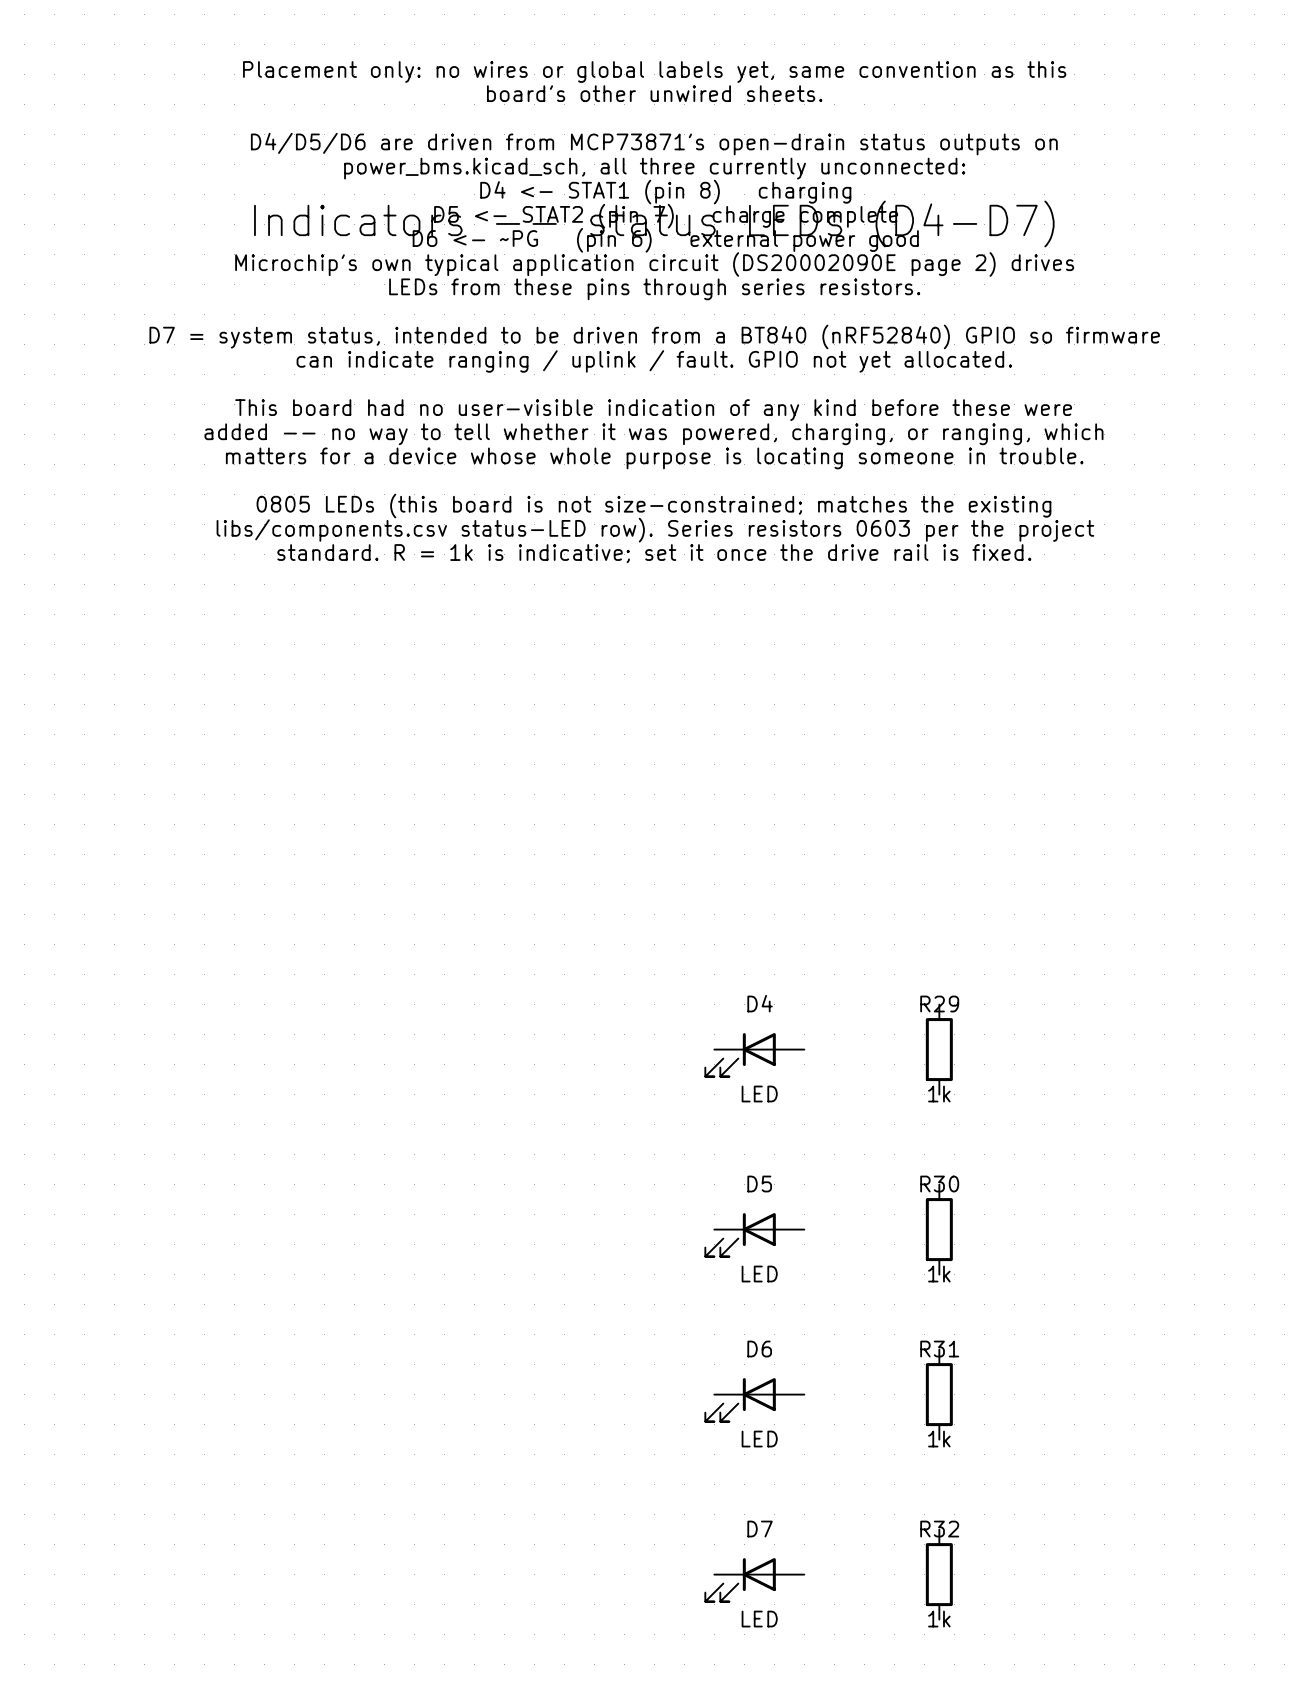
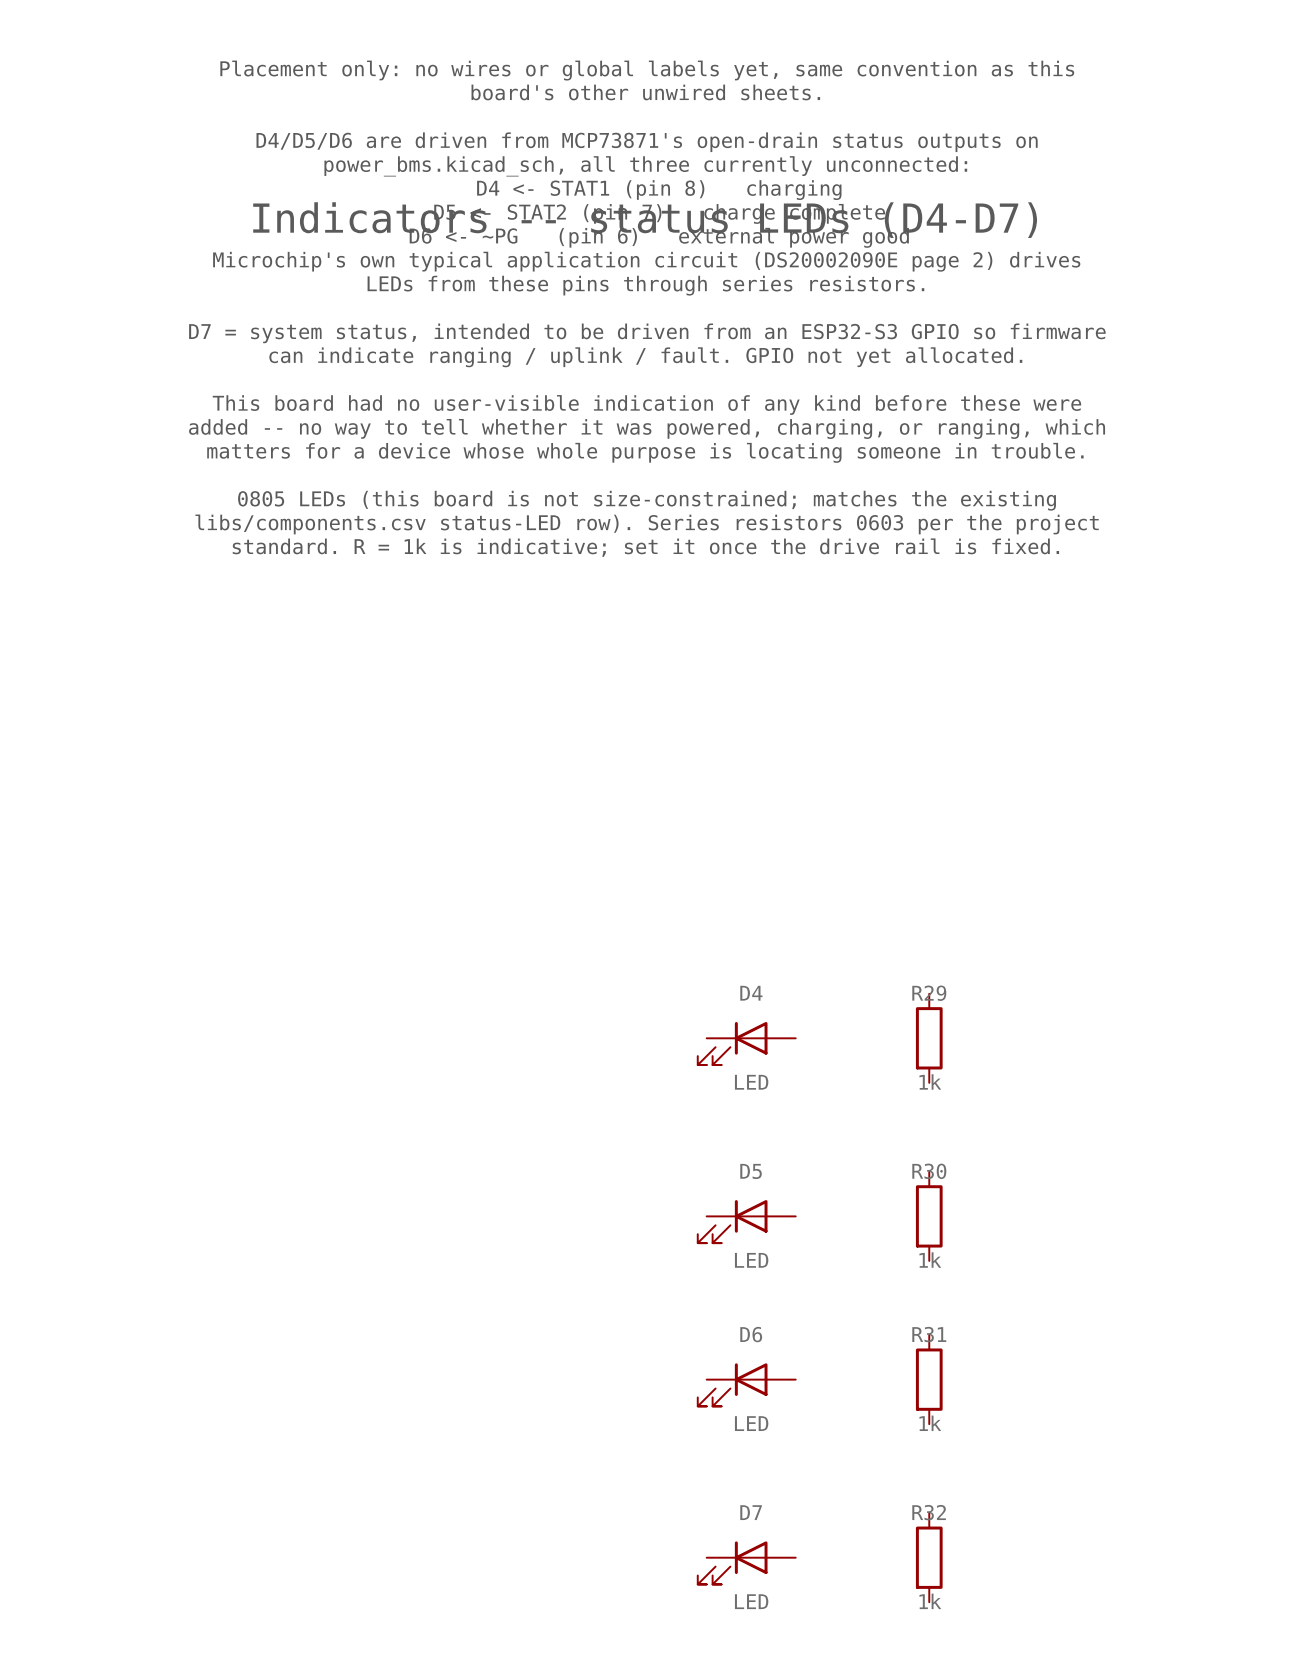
text: D7 = system status, intended to be driven from a BT840 (nRF52840) GPIO so firmware (654, 336) -> D7 = system status, intended to be driven from an ESP32-S3 GPIO so firmware (647, 333)

